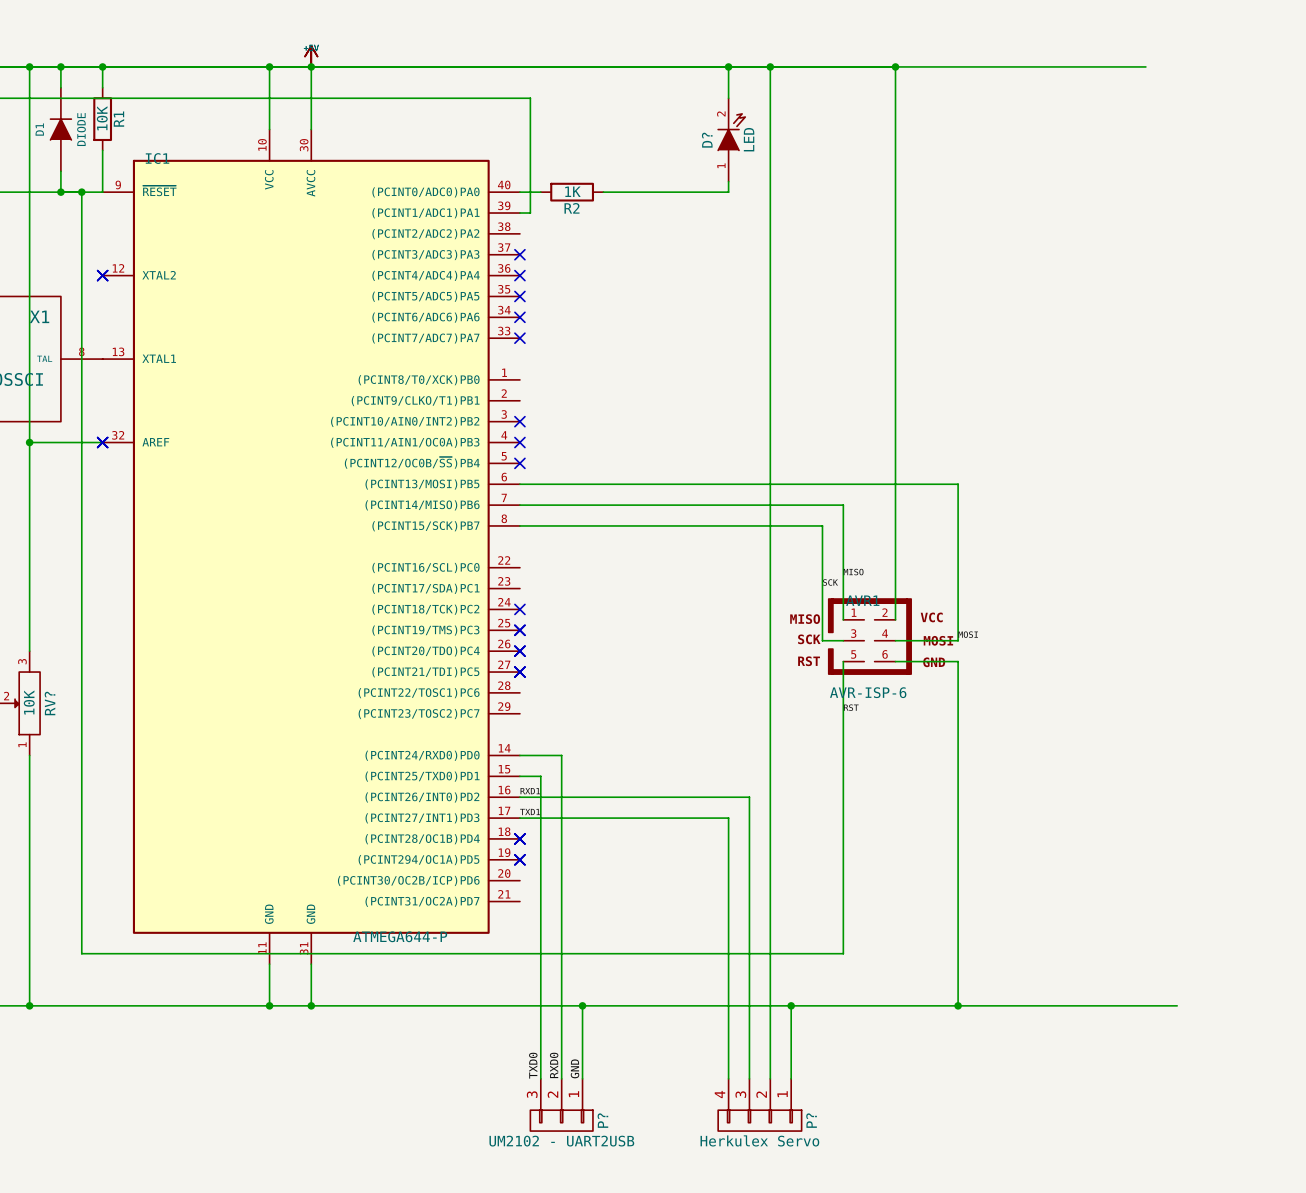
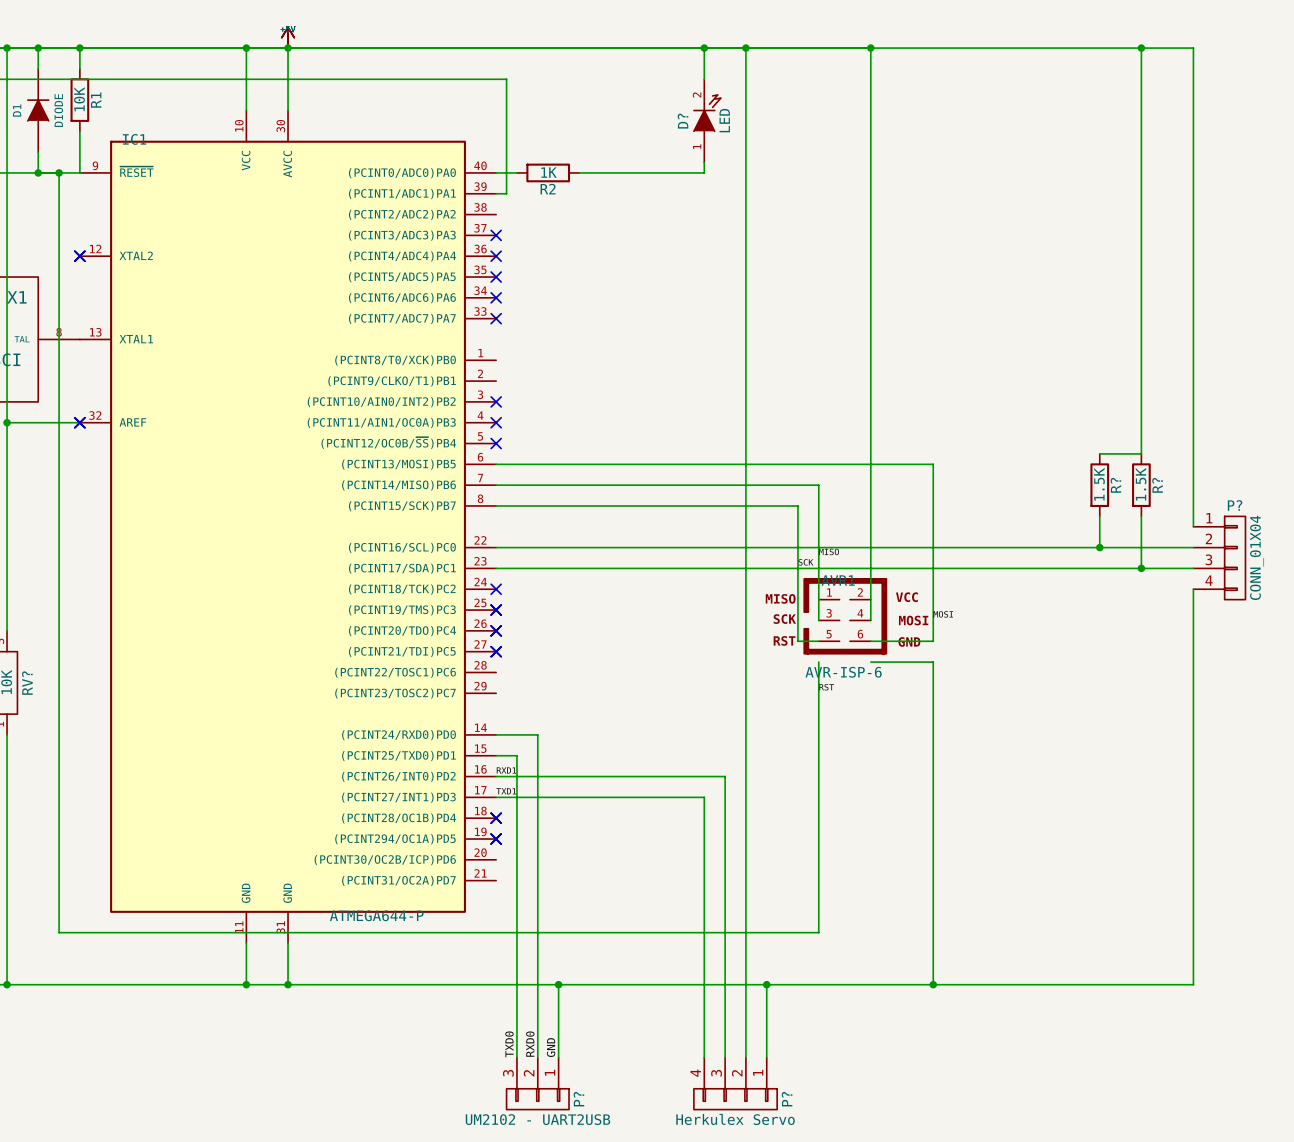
wire: none -> (1120, 48) (1193, 48) (1193, 526)
wire: none -> (1141, 48) (1141, 453) (1099, 453)
junction: none -> (1141, 48)
R?: none -> 1.5K (1099, 485)
R?: none -> 1.5K (1141, 485)
wire: none -> (1099, 516) (1099, 547)
wire: none -> (1141, 516) (1141, 568)
wire: none -> (496, 547) (1193, 547)
junction: none -> (1099, 547)
P?: none -> CONN_01X04 (1219, 558)
wire: none -> (496, 568) (1193, 568)
junction: none -> (1141, 568)
wire: none -> (1193, 589) (1193, 984) (1151, 984)
wire: (822, 640) (843, 640) -> (797, 620) (797, 641) (818, 641)
wire: (895, 640) (958, 640) -> (870, 620) (870, 599)
wire: (843, 661) (843, 682) -> (818, 599) (818, 620)
wire: (958, 661) (958, 682) -> (933, 641) (933, 620)
wire: none -> (870, 662) (933, 662)

